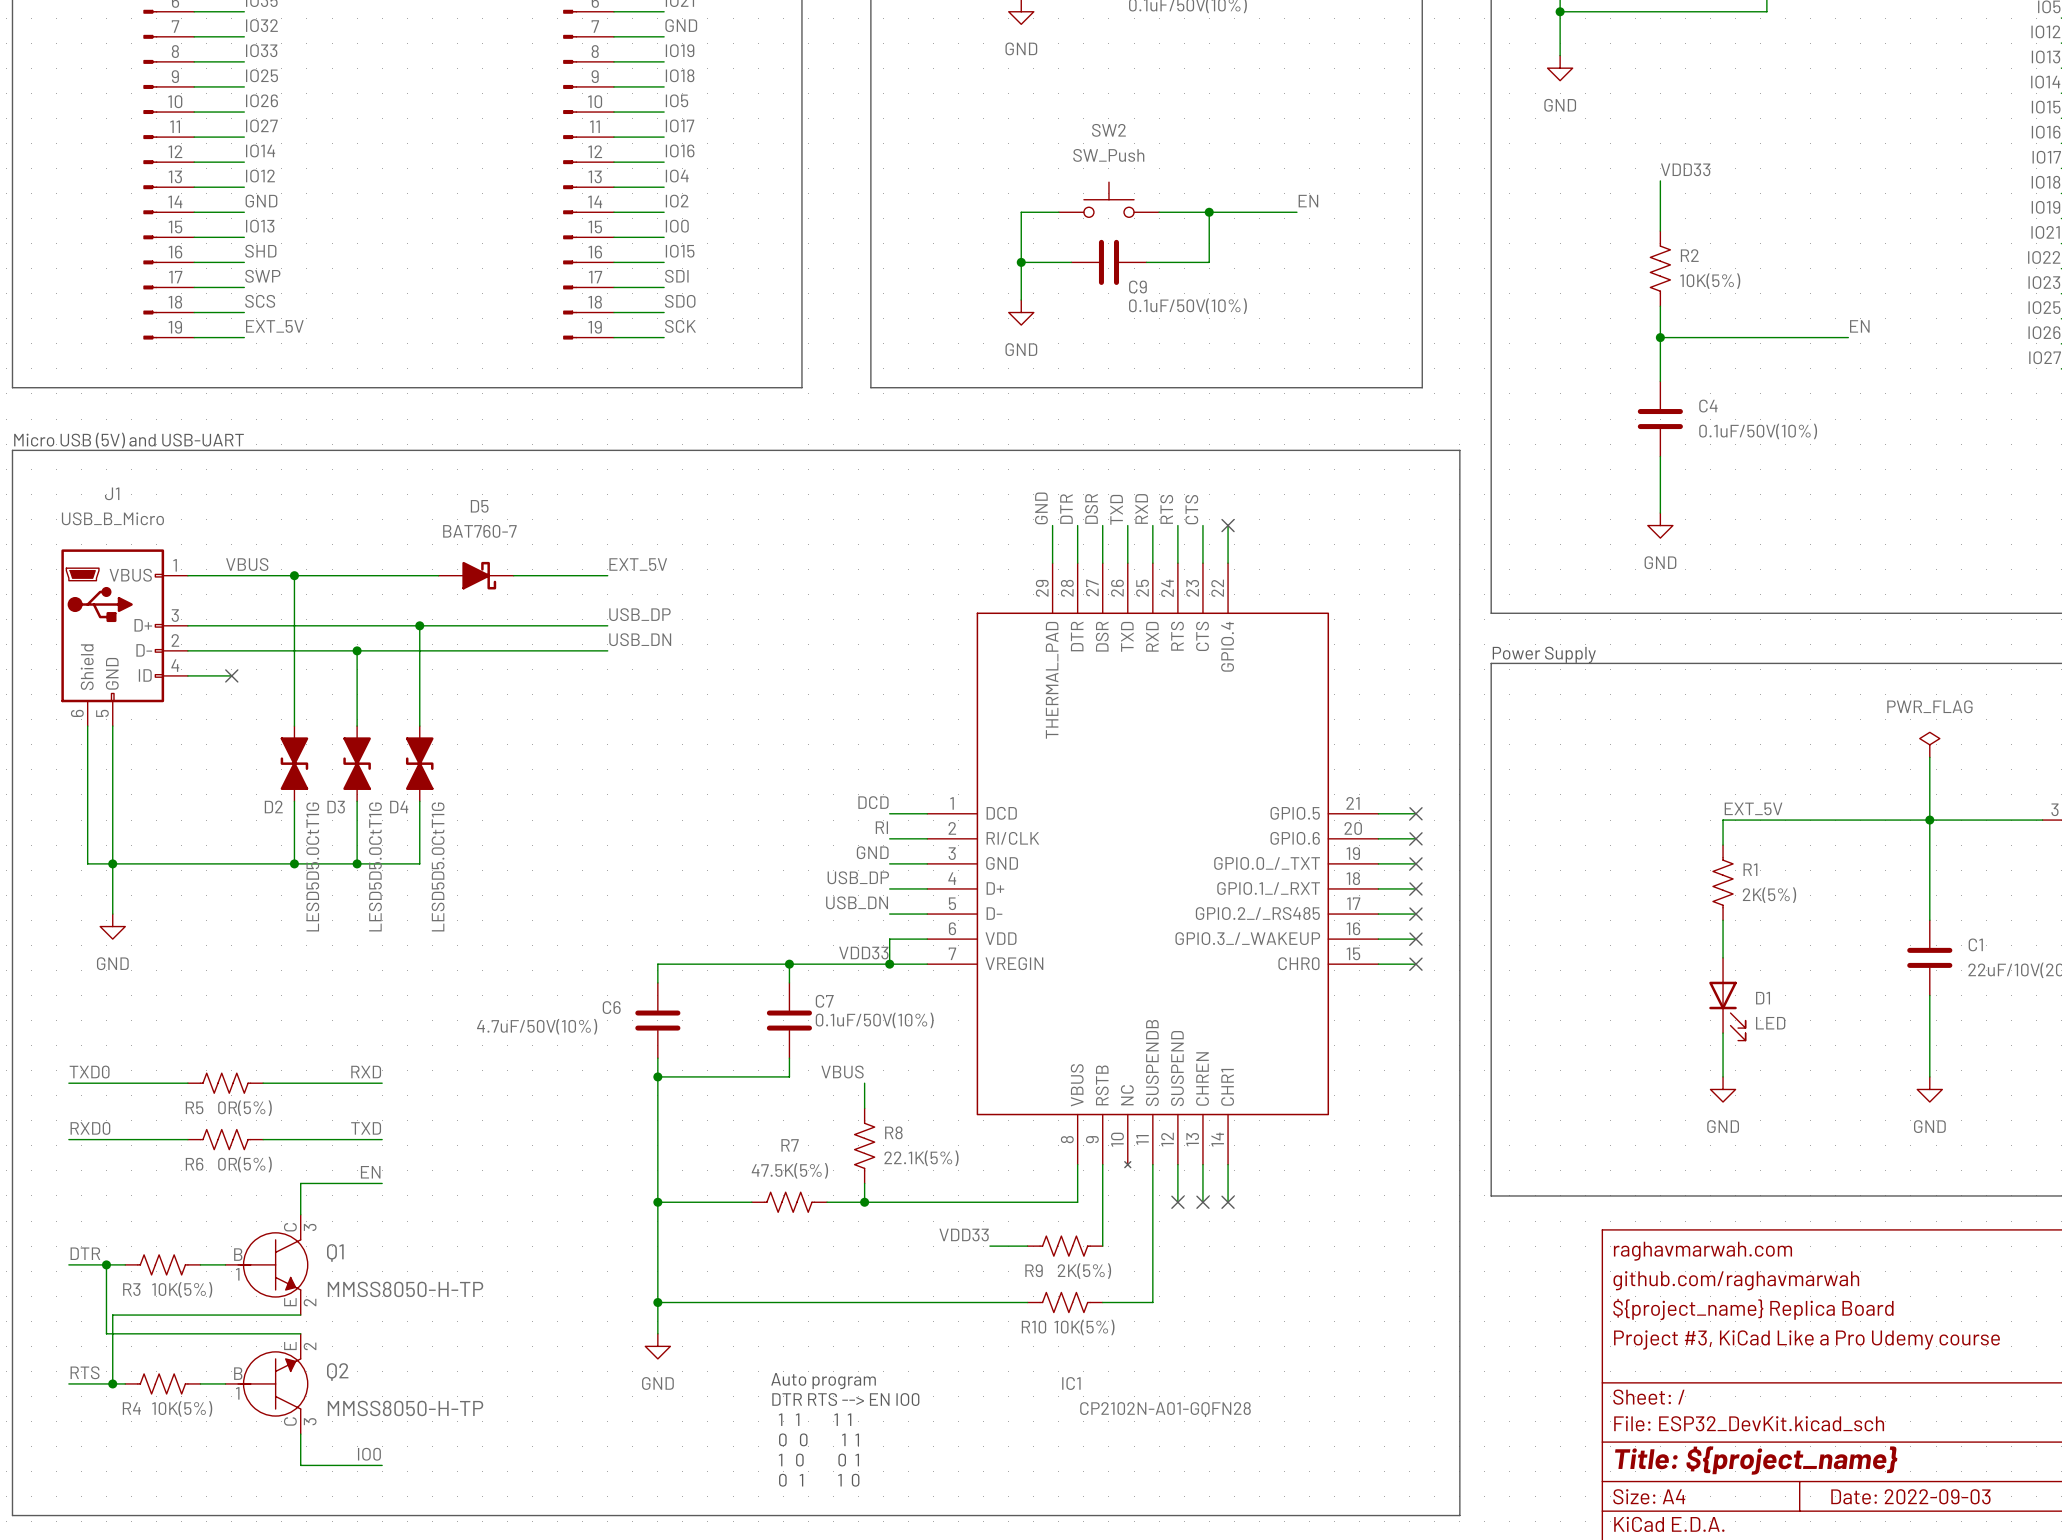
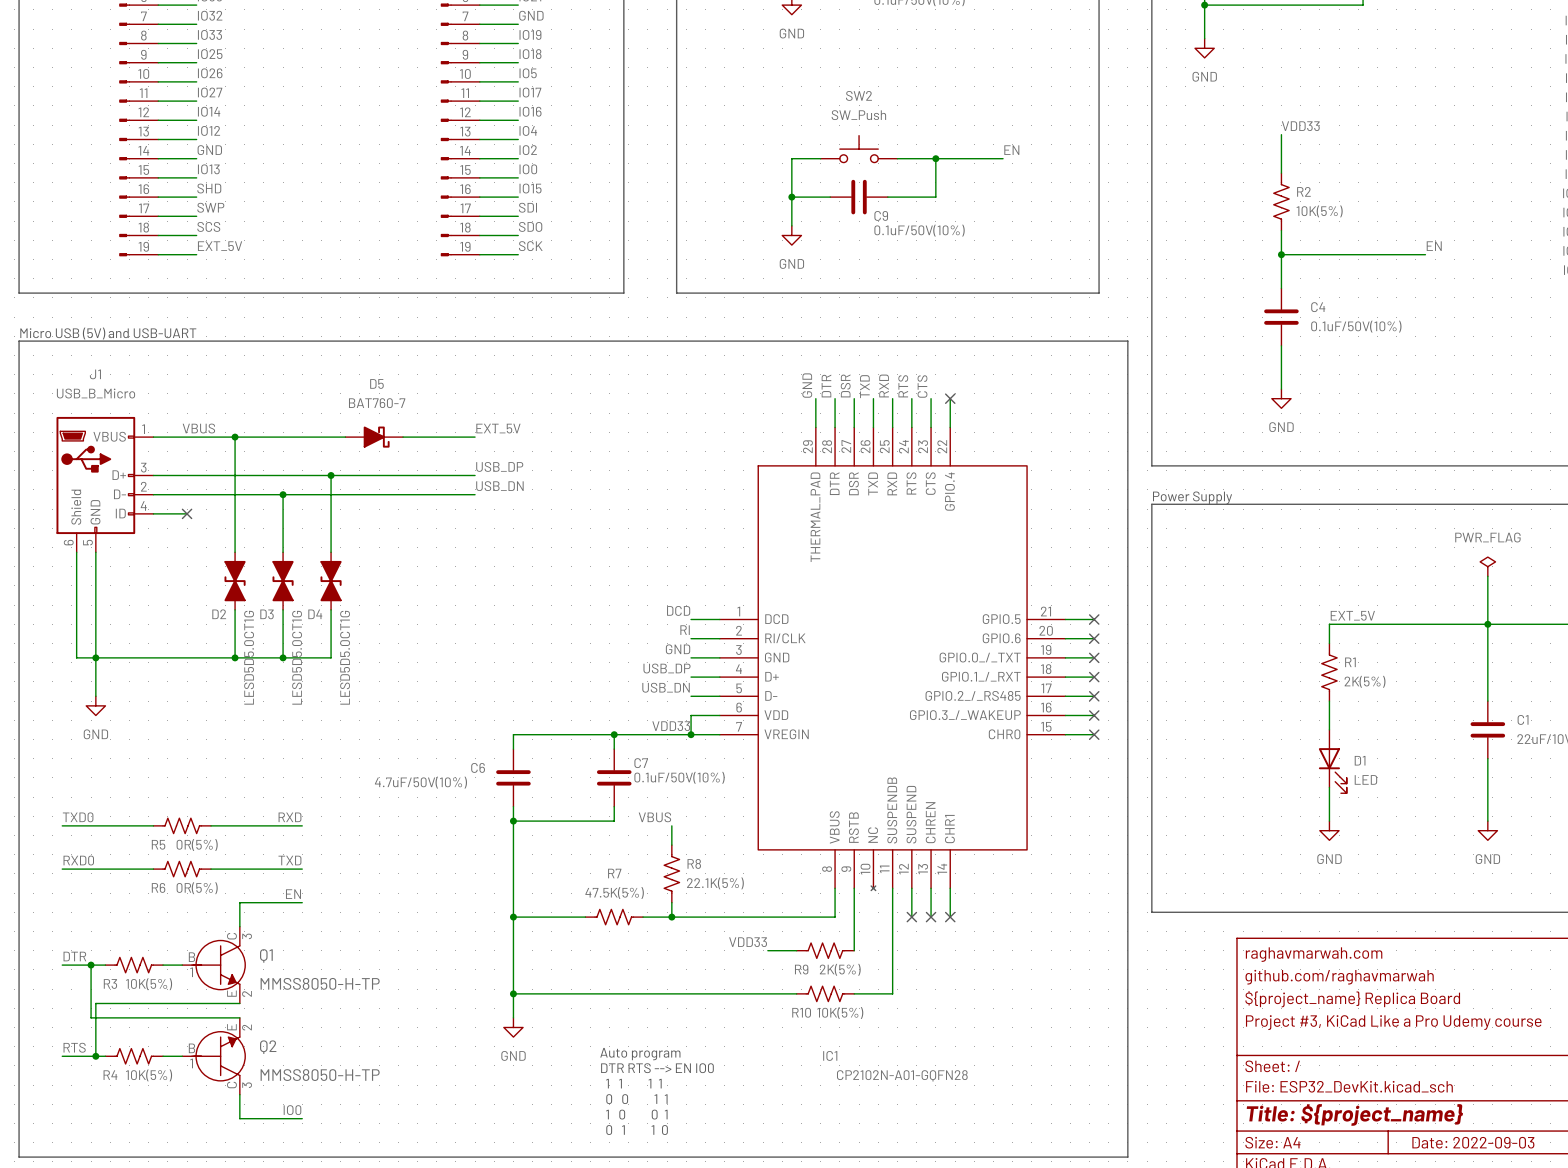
D2 value: LESD5D5.0CtT1G (312, 866) -> LESD5D5.0CT1G (249, 657)
D3 value: LESD5D5.0CtT1G (375, 866) -> LESD5D5.0CT1G (297, 657)
D4 value: LESD5D5.0CtT1G (438, 866) -> LESD5D5.0CT1G (345, 657)

